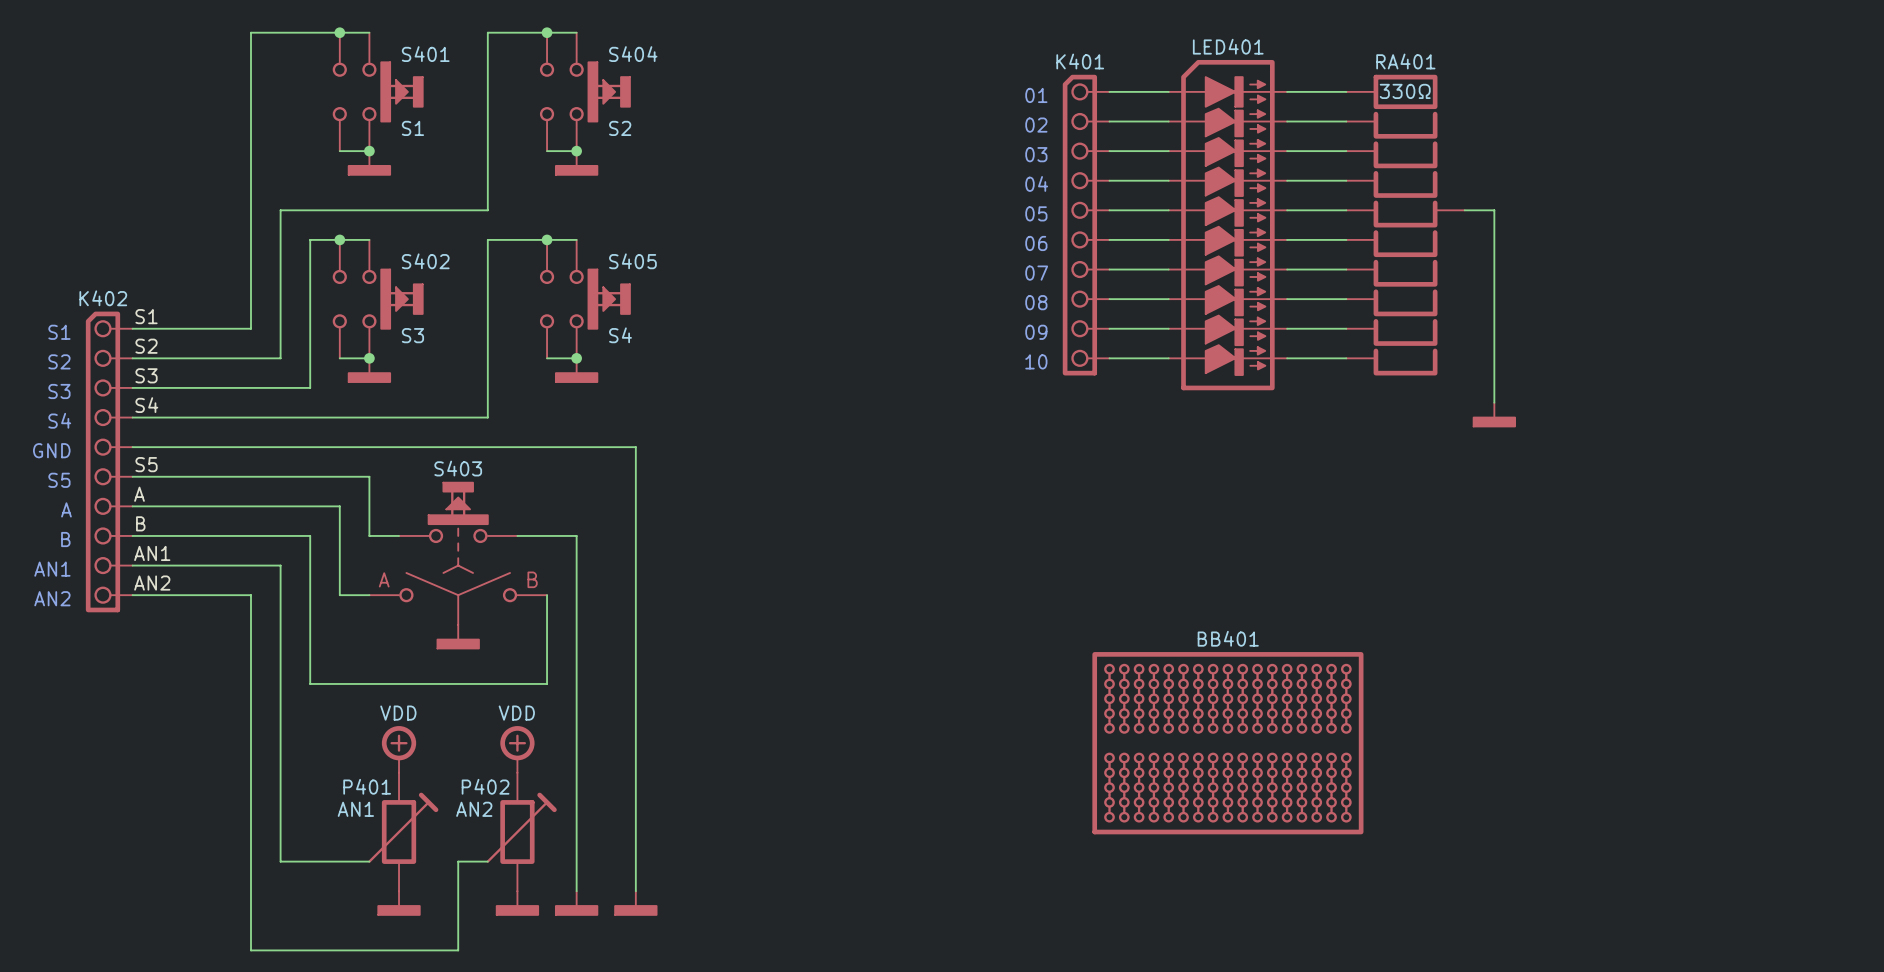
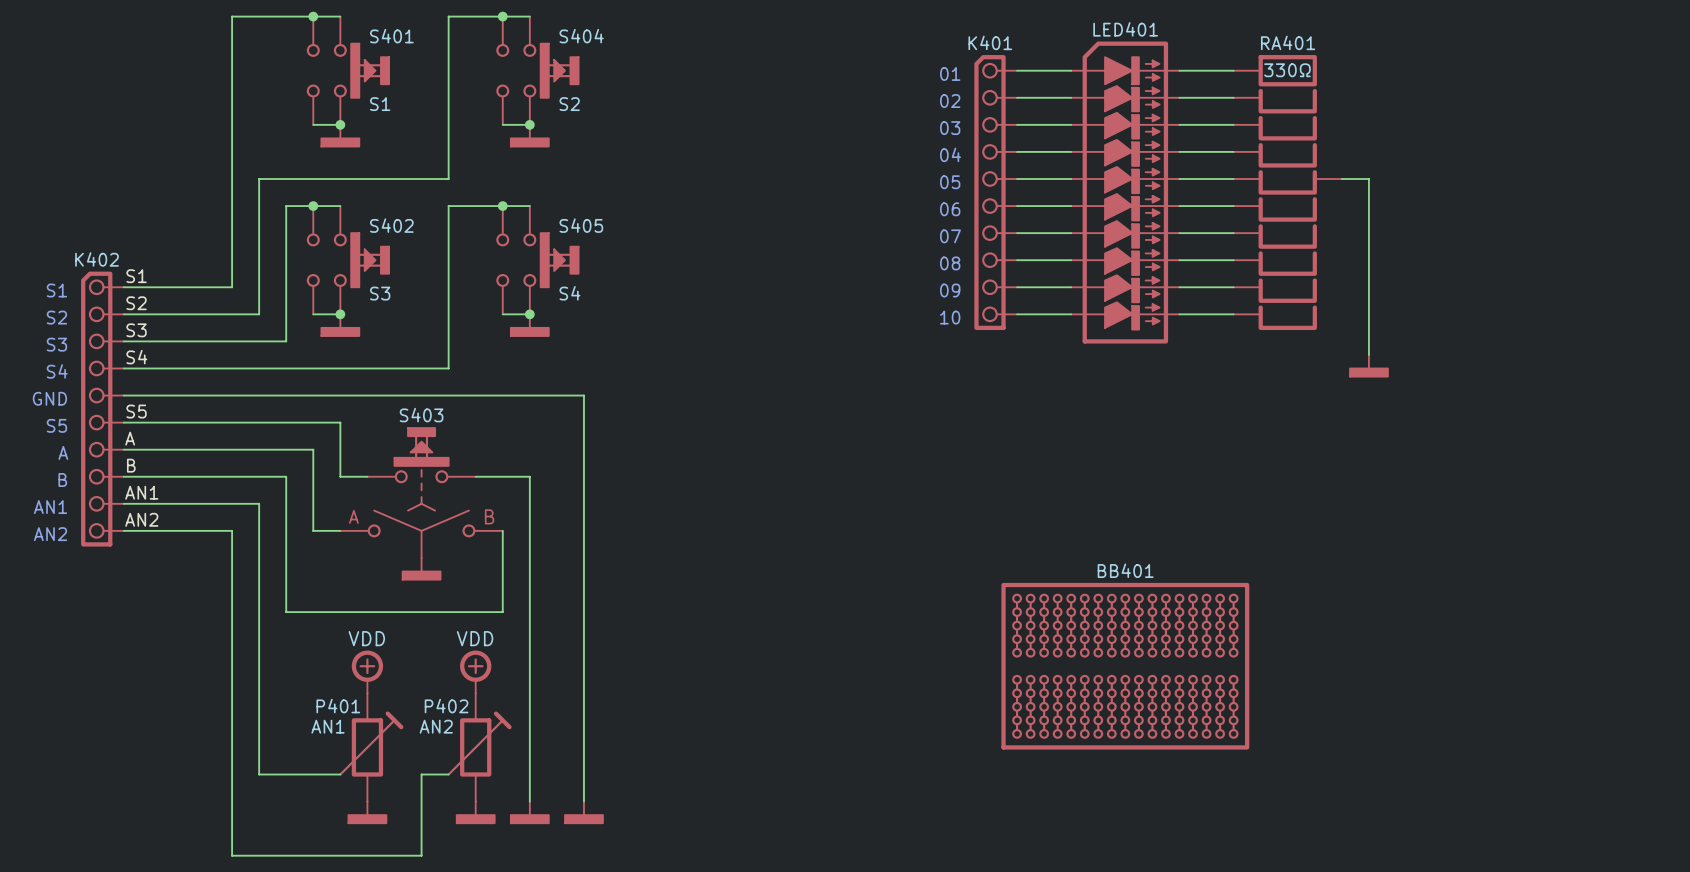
power symbol text: none -> VDD (366, 638)
power symbol text: VDD (398, 713) -> none
power symbol text: none -> VDD (475, 638)
power symbol text: VDD (516, 713) -> none

